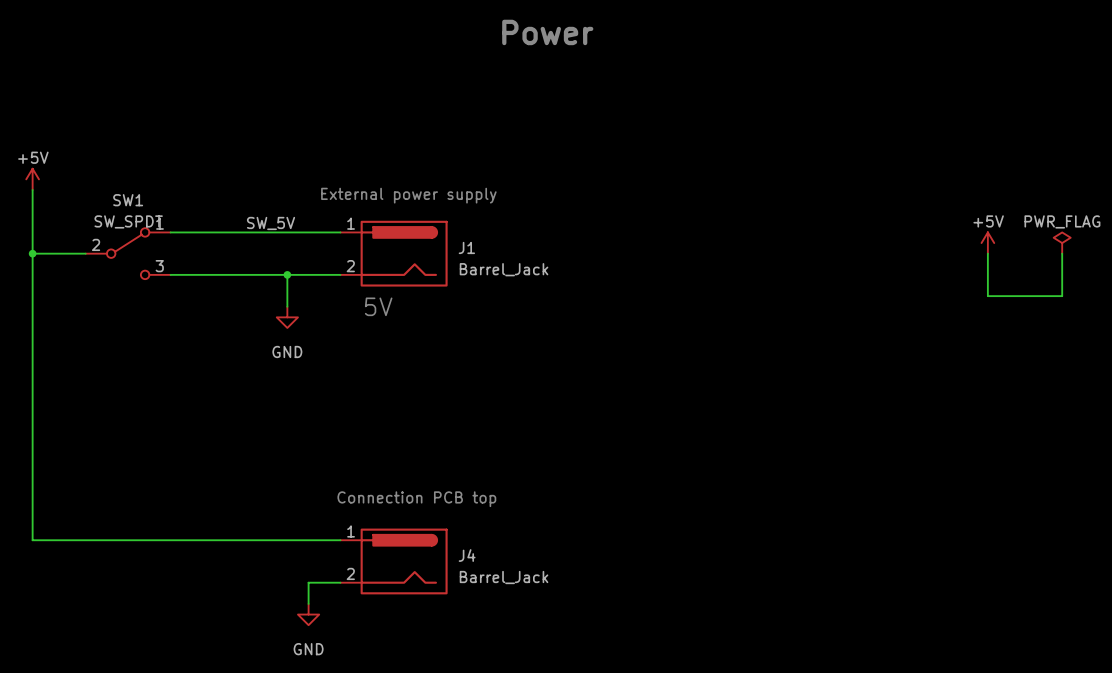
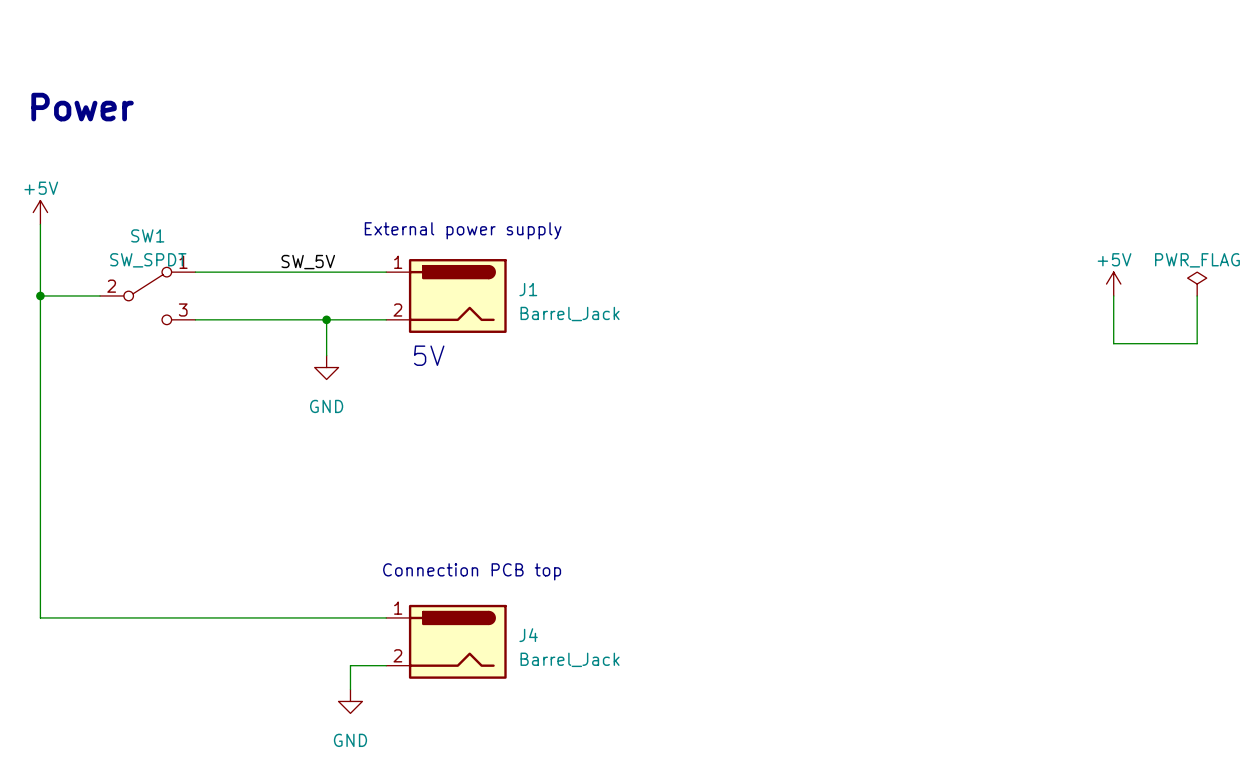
text: Power (547, 32) -> none
text: none -> Power (82, 107)

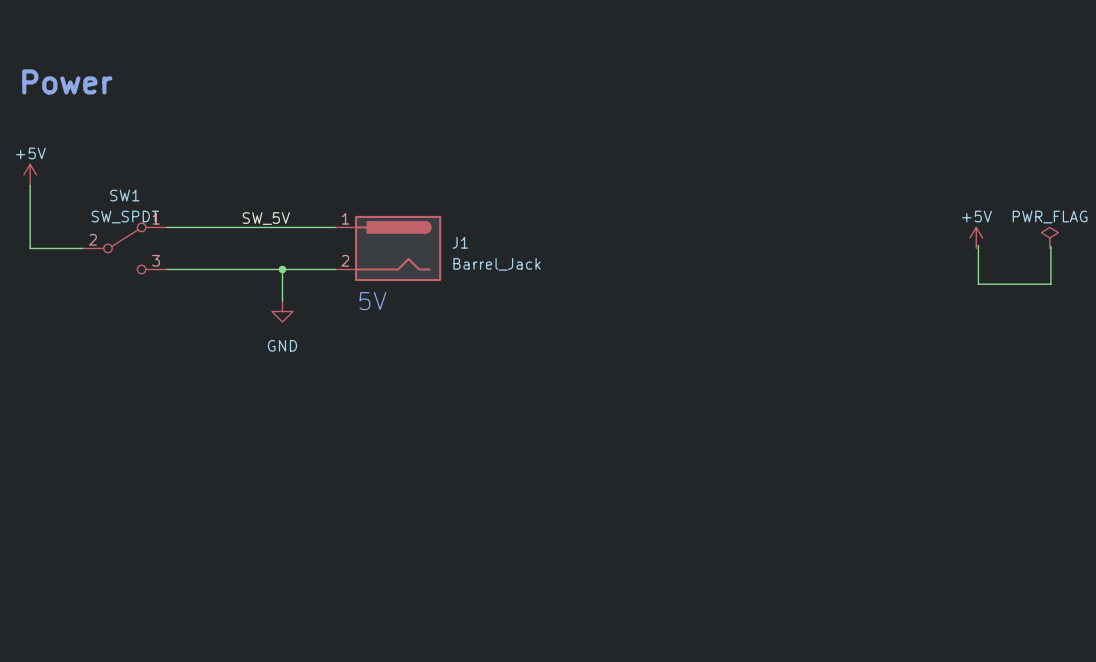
text: External power supply (463, 230) -> none
wire: none -> (978, 245) (978, 284) (1050, 284) (1050, 246)
wire: (40, 295) (40, 617) (386, 617) -> none
junction: (40, 295) -> none
wire: (1113, 295) (1113, 343) (1197, 343) (1197, 295) -> none
text: Connection PCB top (472, 571) -> none
J4: Barrel_Jack (446, 641) -> none
wire: (386, 665) (350, 665) (350, 689) -> none
power symbol: GND (350, 701) -> none

